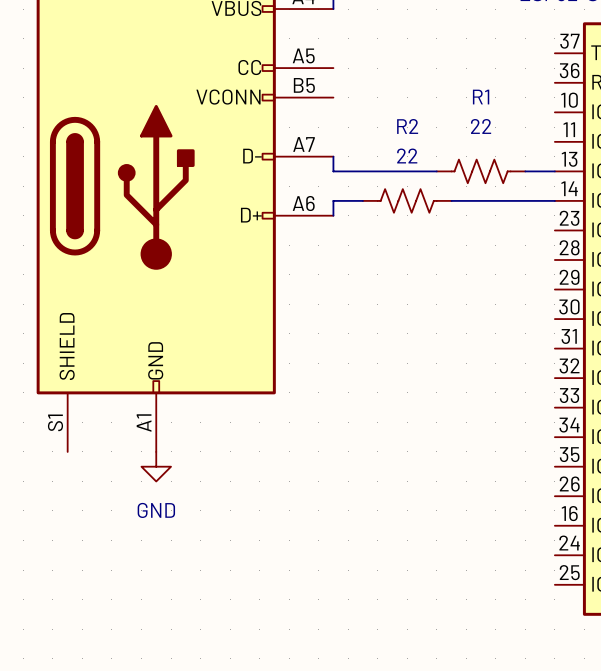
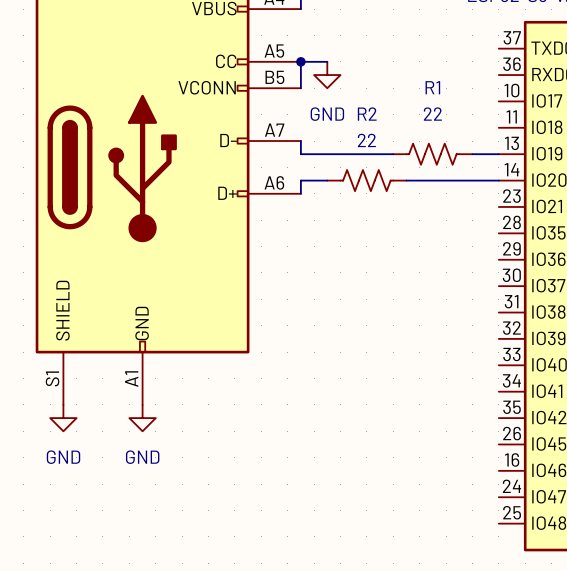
junction: none -> (300, 61)
wire: none -> (327, 61) (300, 61) (300, 88)
power symbol: none -> GND (327, 75)
power symbol: none -> GND (63, 418)

